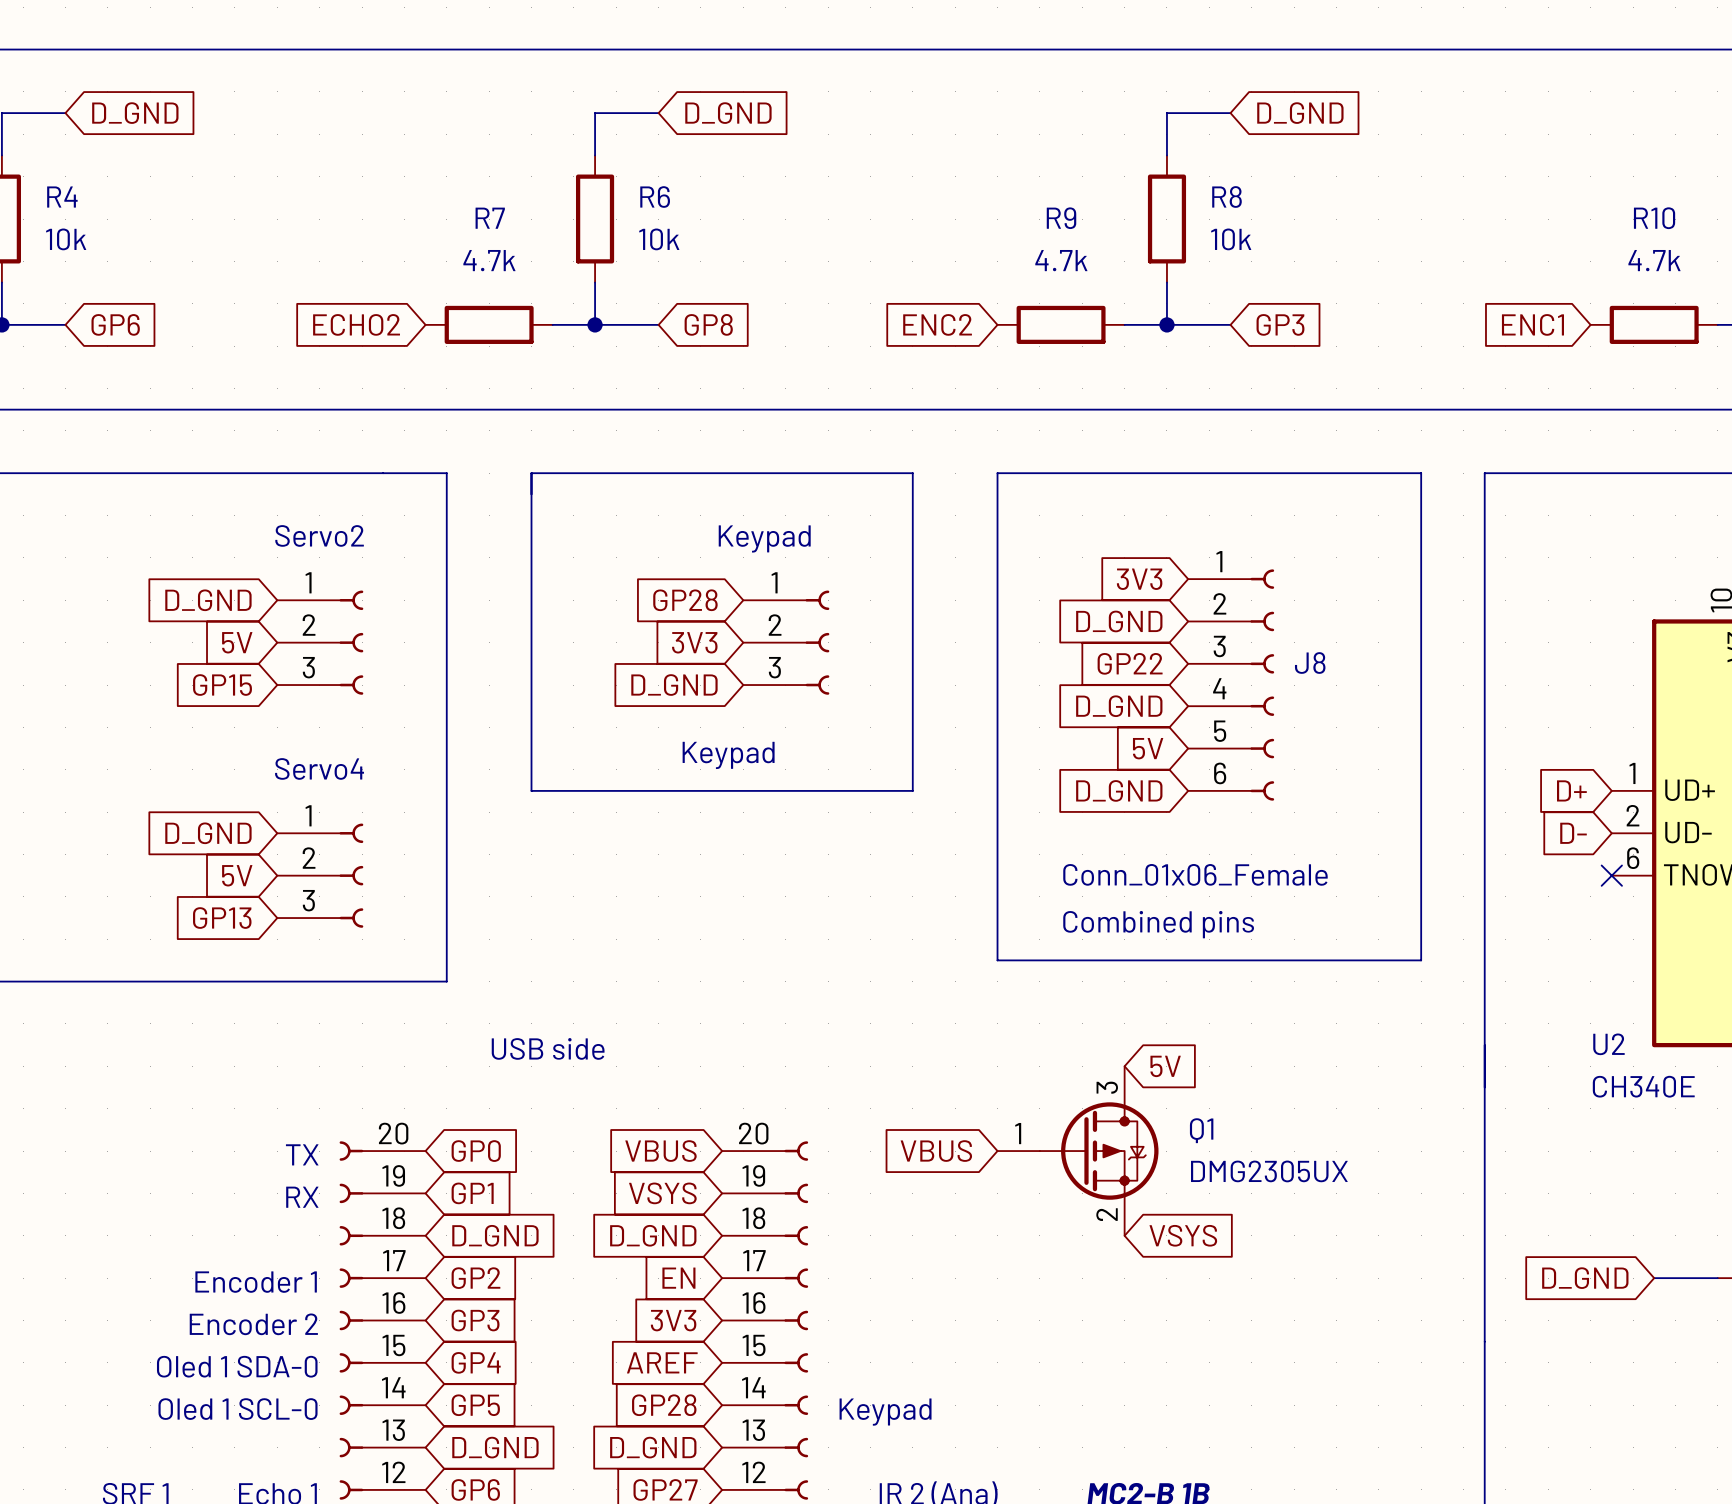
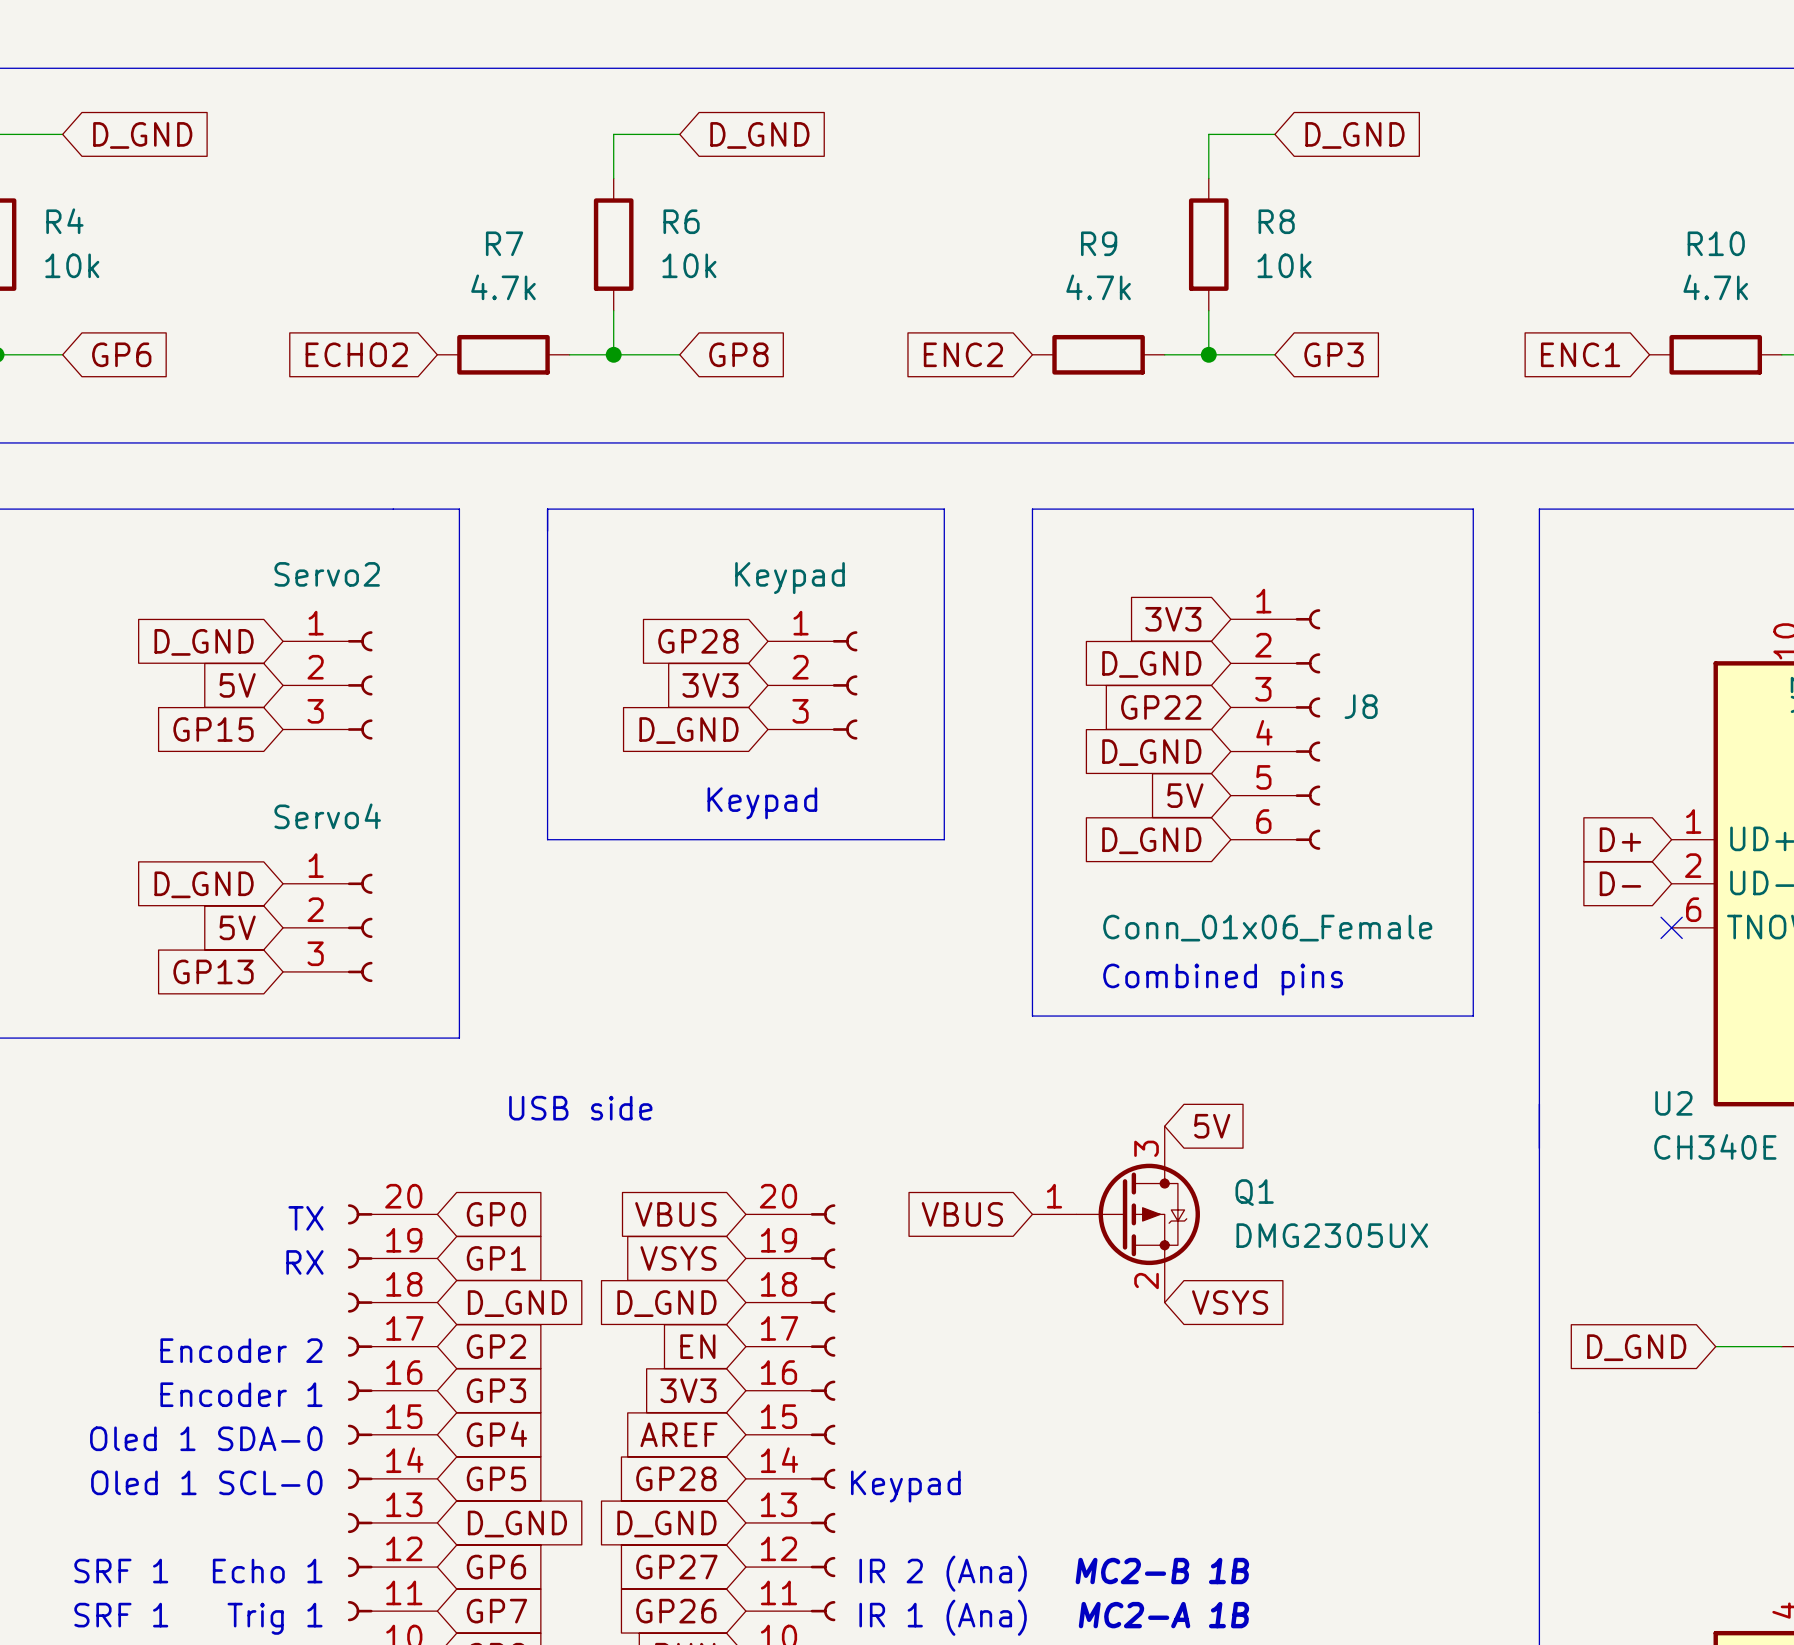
text: Encoder 1 (256, 1282) -> Encoder 2 (241, 1350)
text: Encoder 2 (253, 1324) -> Encoder 1 (241, 1394)

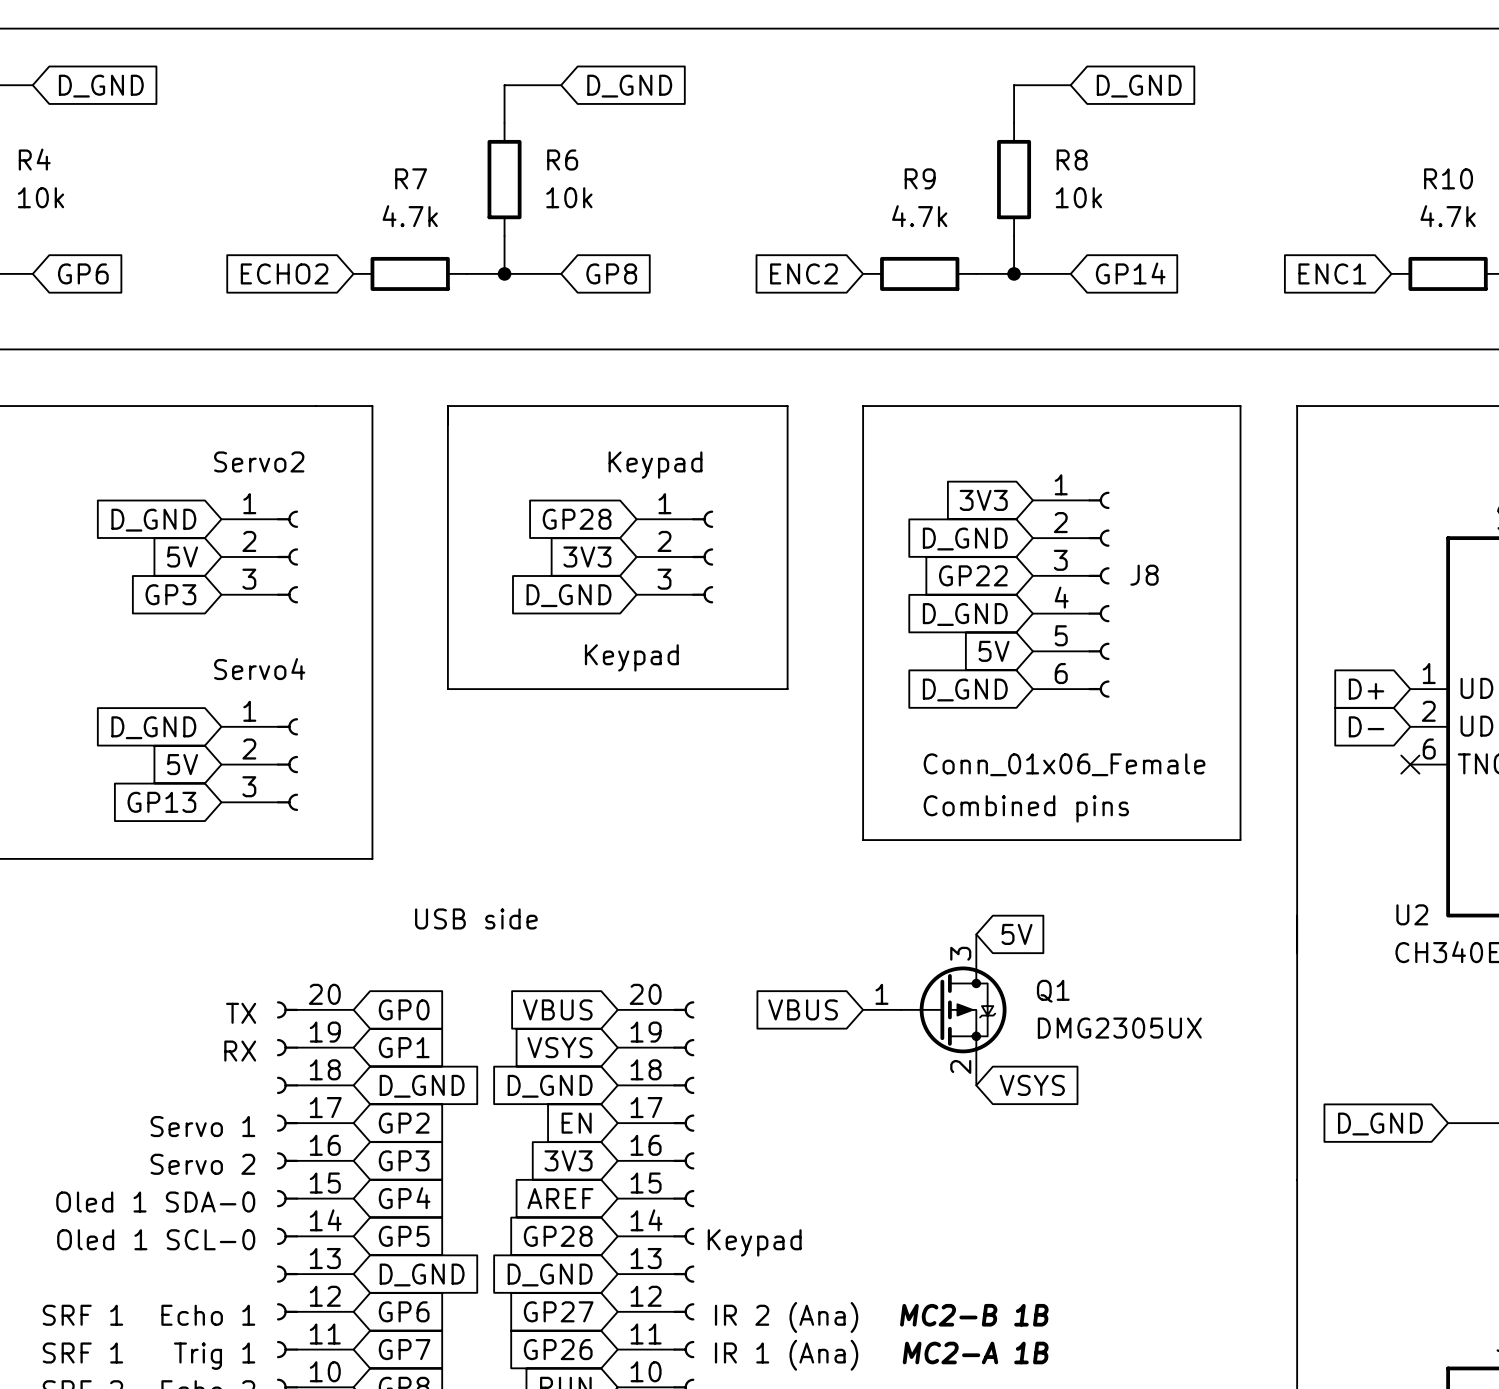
global label: GP3 (1333, 354) -> GP14 (1130, 273)
global label: GP15 (213, 729) -> GP3 (170, 594)
text: Encoder 2 (241, 1350) -> Servo 1 (202, 1126)
text: Encoder 1 (241, 1394) -> Servo 2 (202, 1164)

